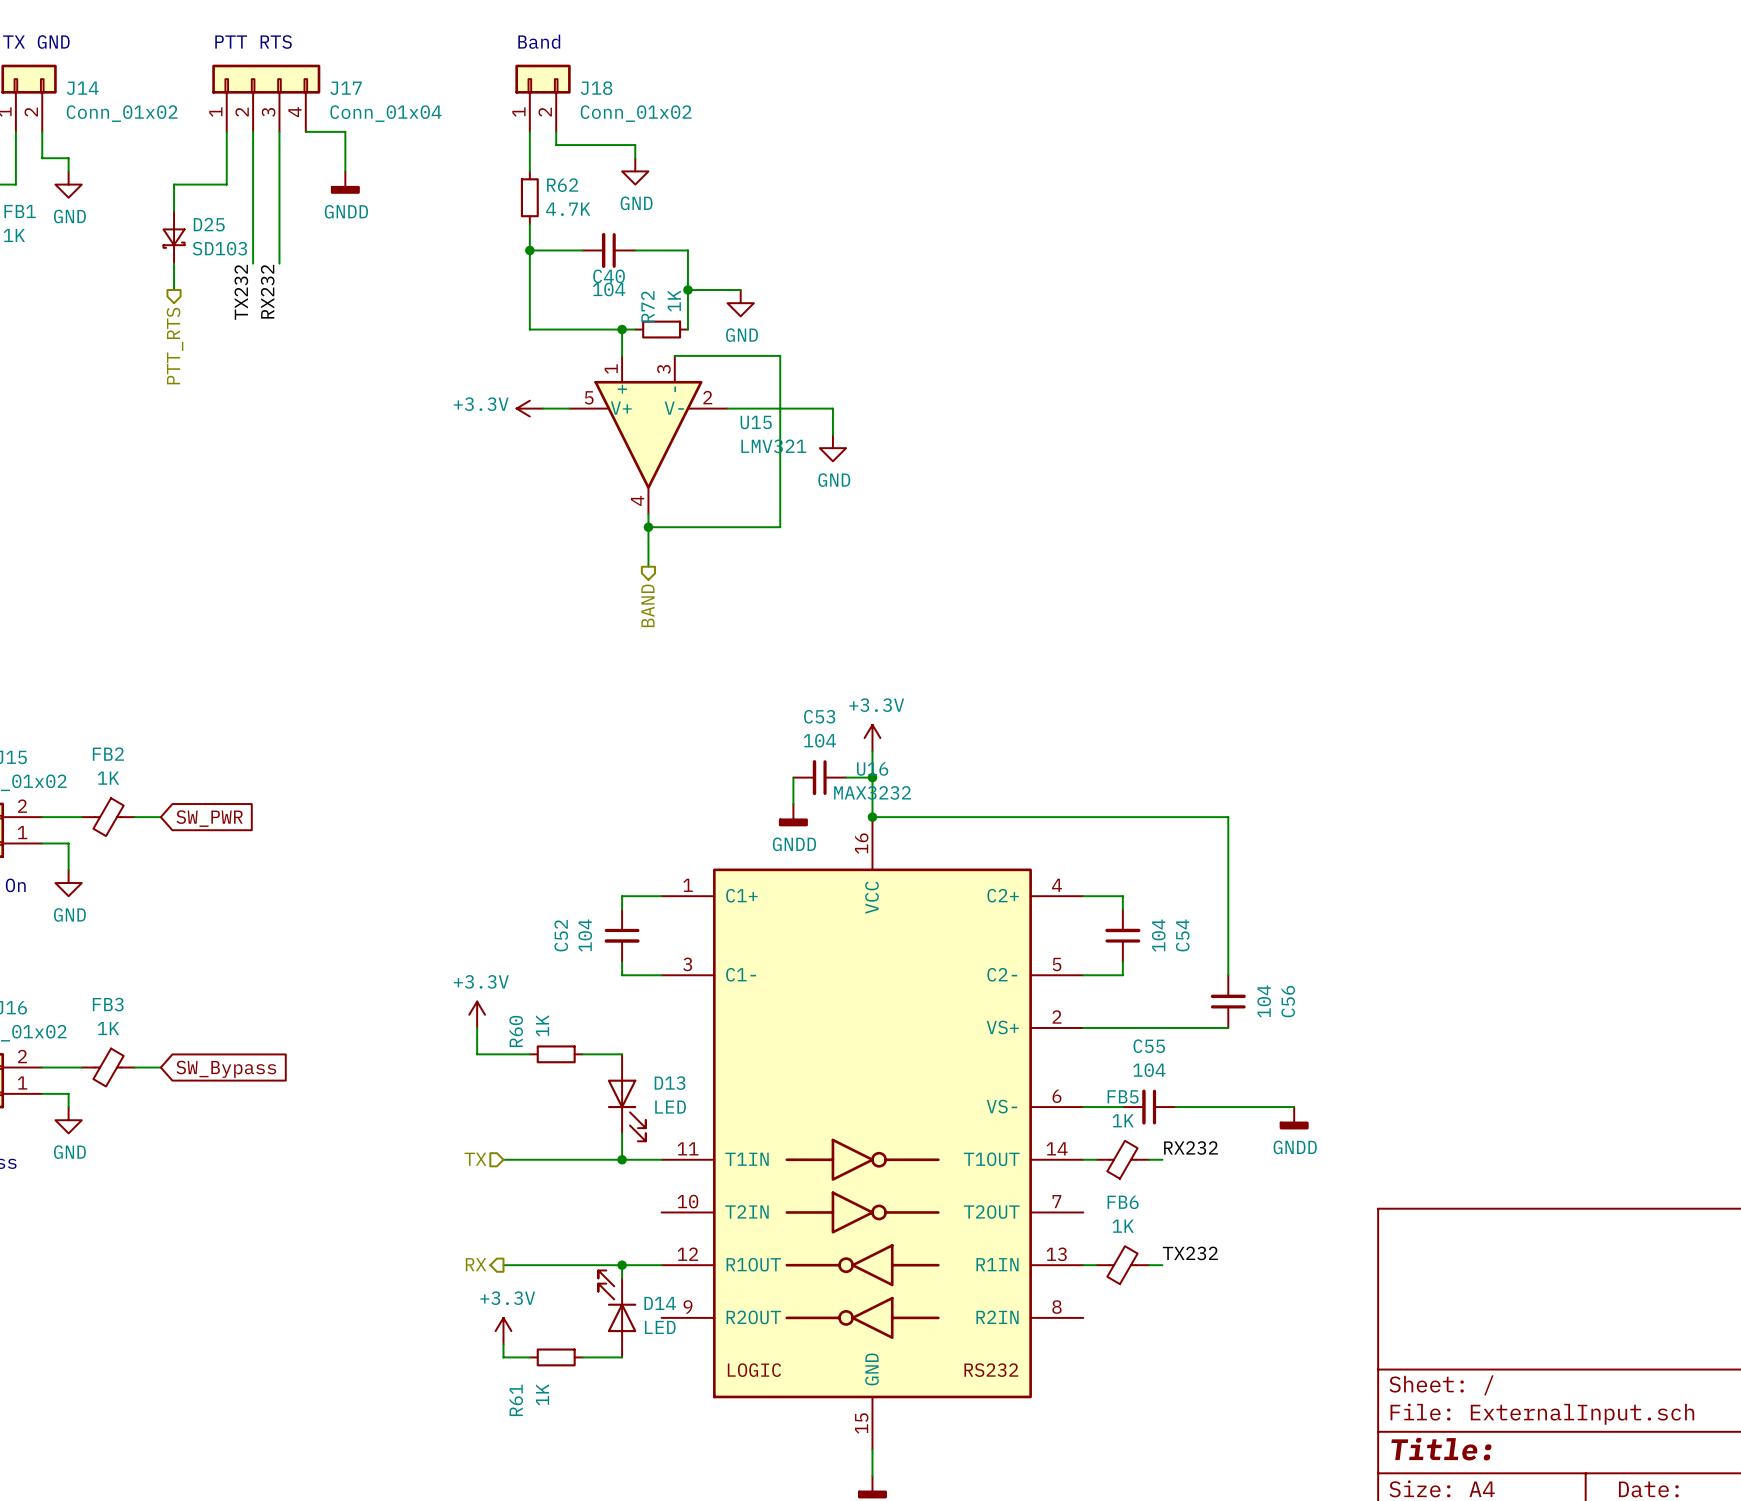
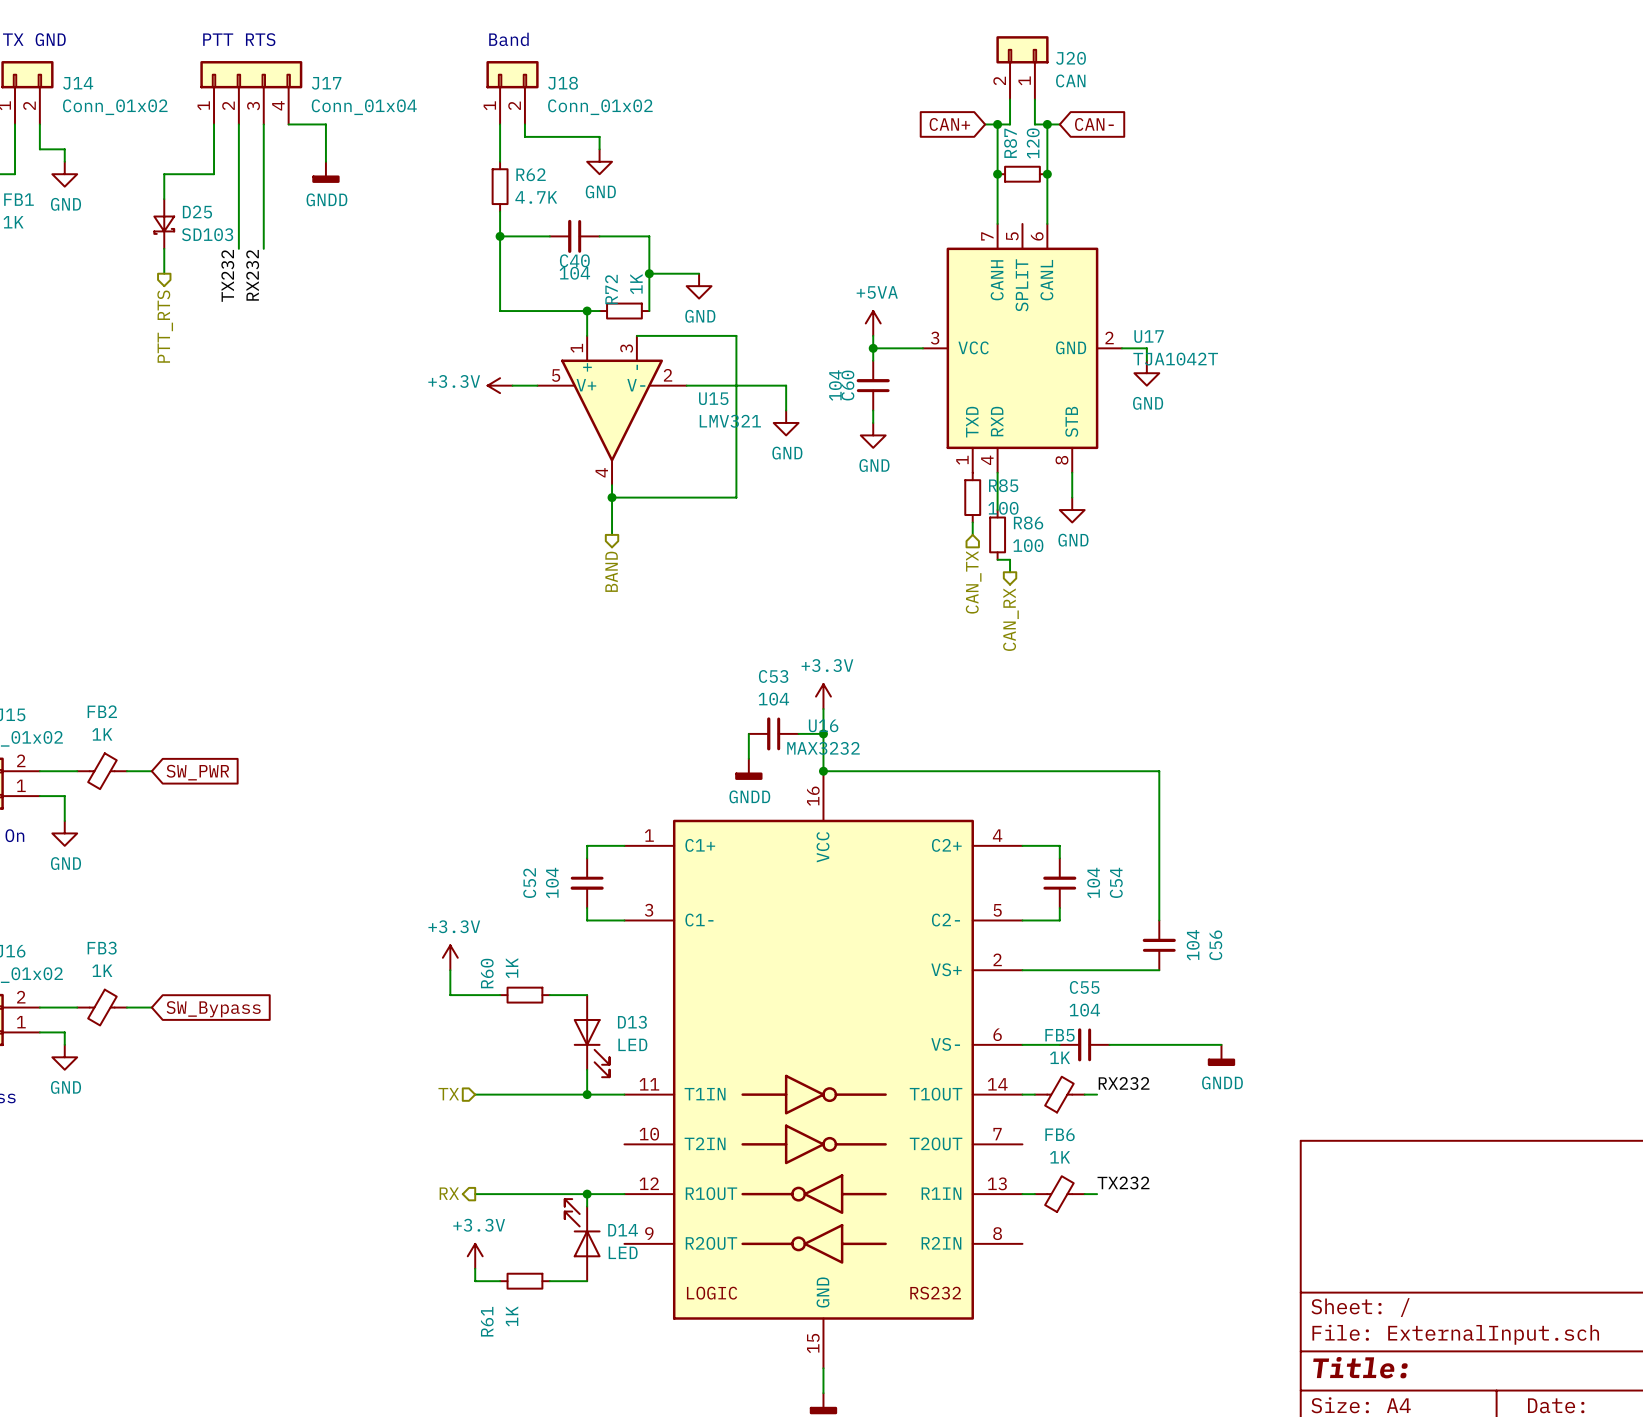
J20: none -> CAN (1022, 67)
wire: none -> (1010, 99) (1010, 124) (985, 124)
wire: none -> (1034, 99) (1034, 124) (1059, 124)
global label: none -> CAN+ (949, 124)
wire: none -> (997, 124) (997, 223)
junction: none -> (997, 124)
wire: none -> (1047, 124) (1047, 223)
junction: none -> (1047, 124)
global label: none -> CAN- (1094, 124)
junction: none -> (997, 174)
R87: none -> 120 (1022, 174)
junction: none -> (1047, 174)
power symbol: none -> +5VA (873, 323)
wire: none -> (873, 335) (873, 360)
wire: none -> (873, 348) (922, 348)
junction: none -> (873, 348)
U17: none -> TJA1042T (1022, 348)
wire: none -> (1121, 348) (1146, 348) (1146, 360)
power symbol: none -> GND (1146, 373)
C60: none -> 104 (873, 385)
wire: none -> (873, 410) (873, 422)
power symbol: none -> GND (873, 435)
wire: none -> (997, 472) (997, 510)
wire: none -> (1072, 472) (1072, 497)
R85: none -> 100 (972, 497)
power symbol: none -> GND (1072, 510)
wire: none -> (972, 522) (972, 534)
R86: none -> 100 (997, 534)
wire: none -> (997, 559) (1010, 559) (1010, 572)
hierarchical label: none -> CAN_TX (973, 582)
hierarchical label: none -> CAN_RX (1010, 619)

